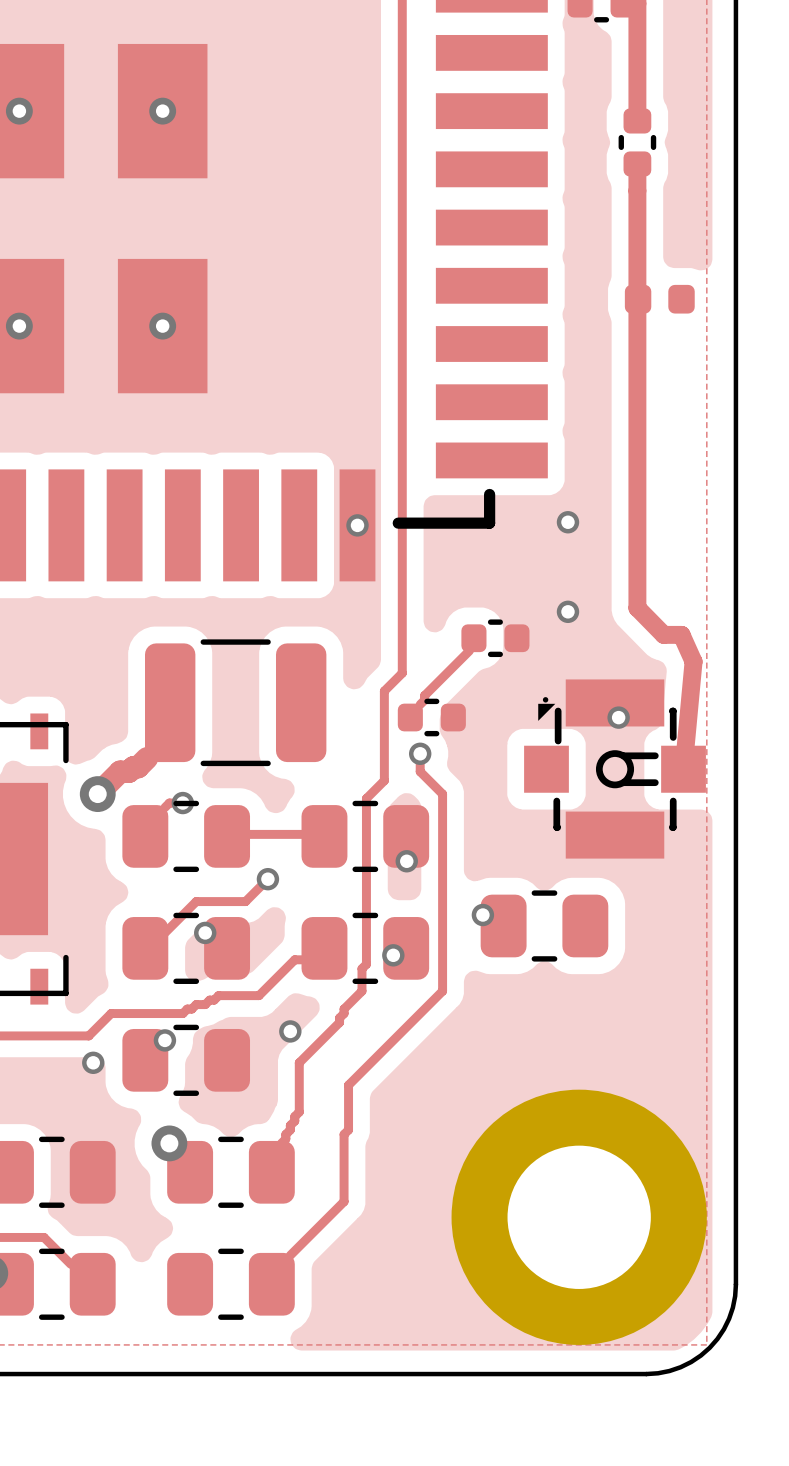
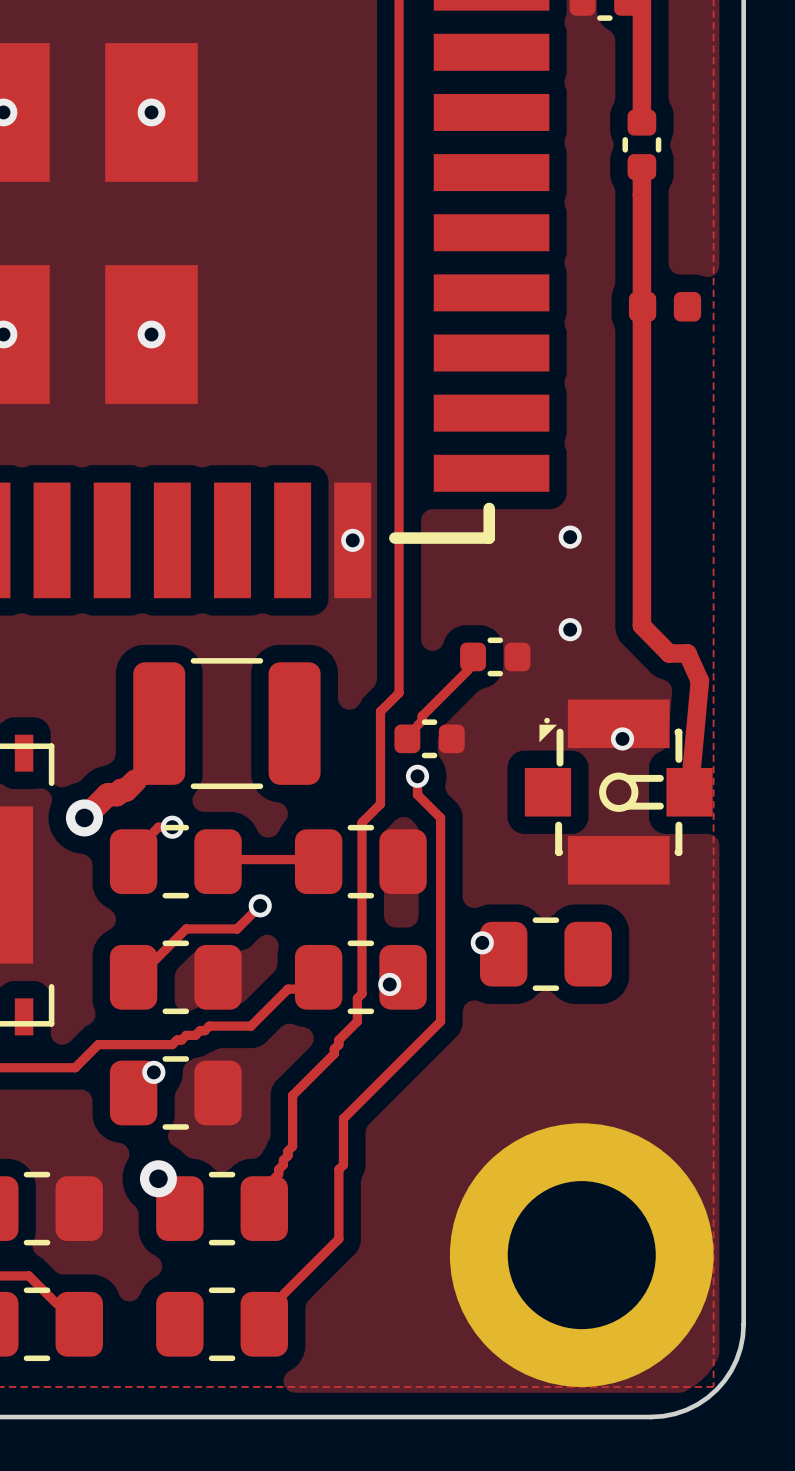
via: (406, 861) -> none
via: (205, 932) -> none
via: (290, 1031) -> none
via: (93, 1062) -> none

